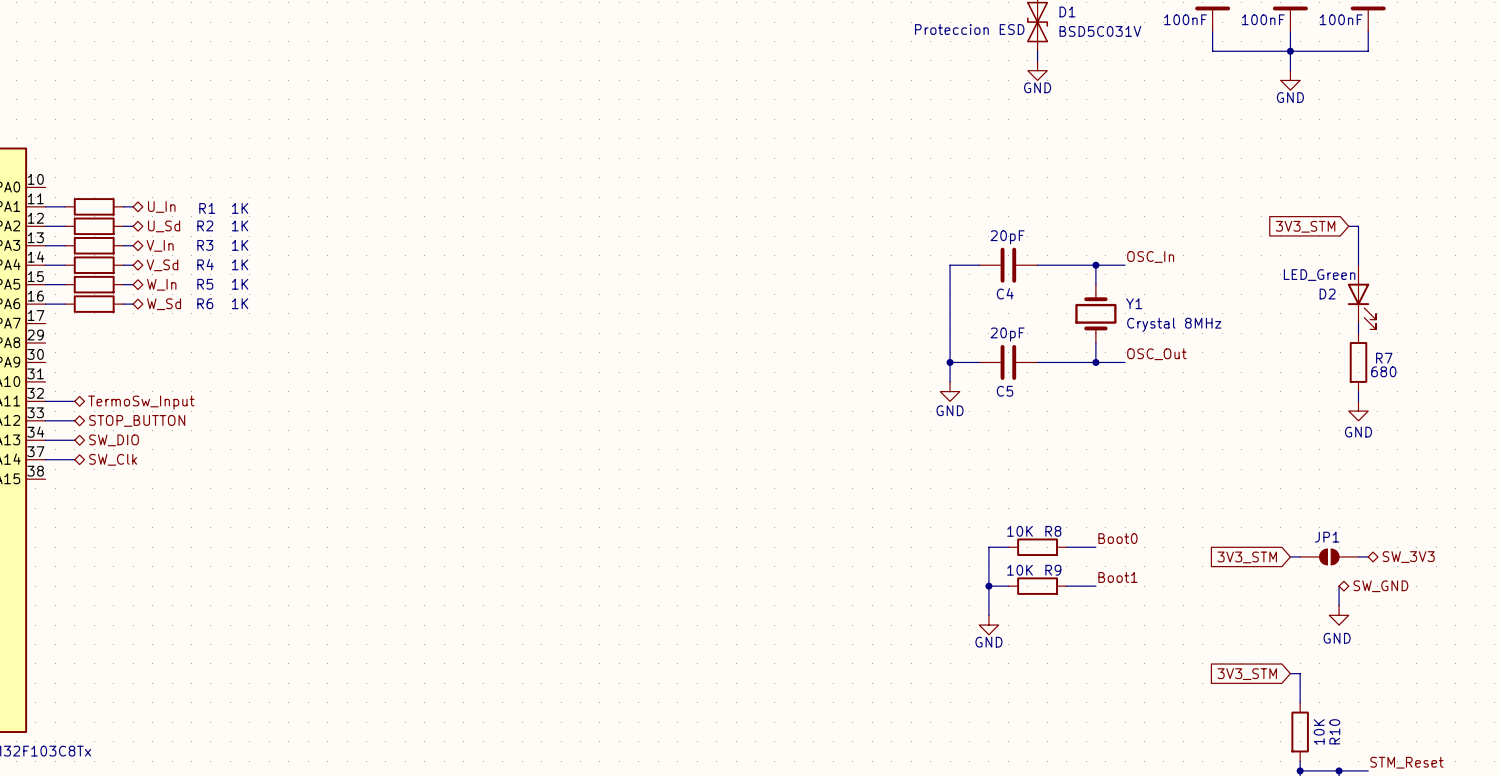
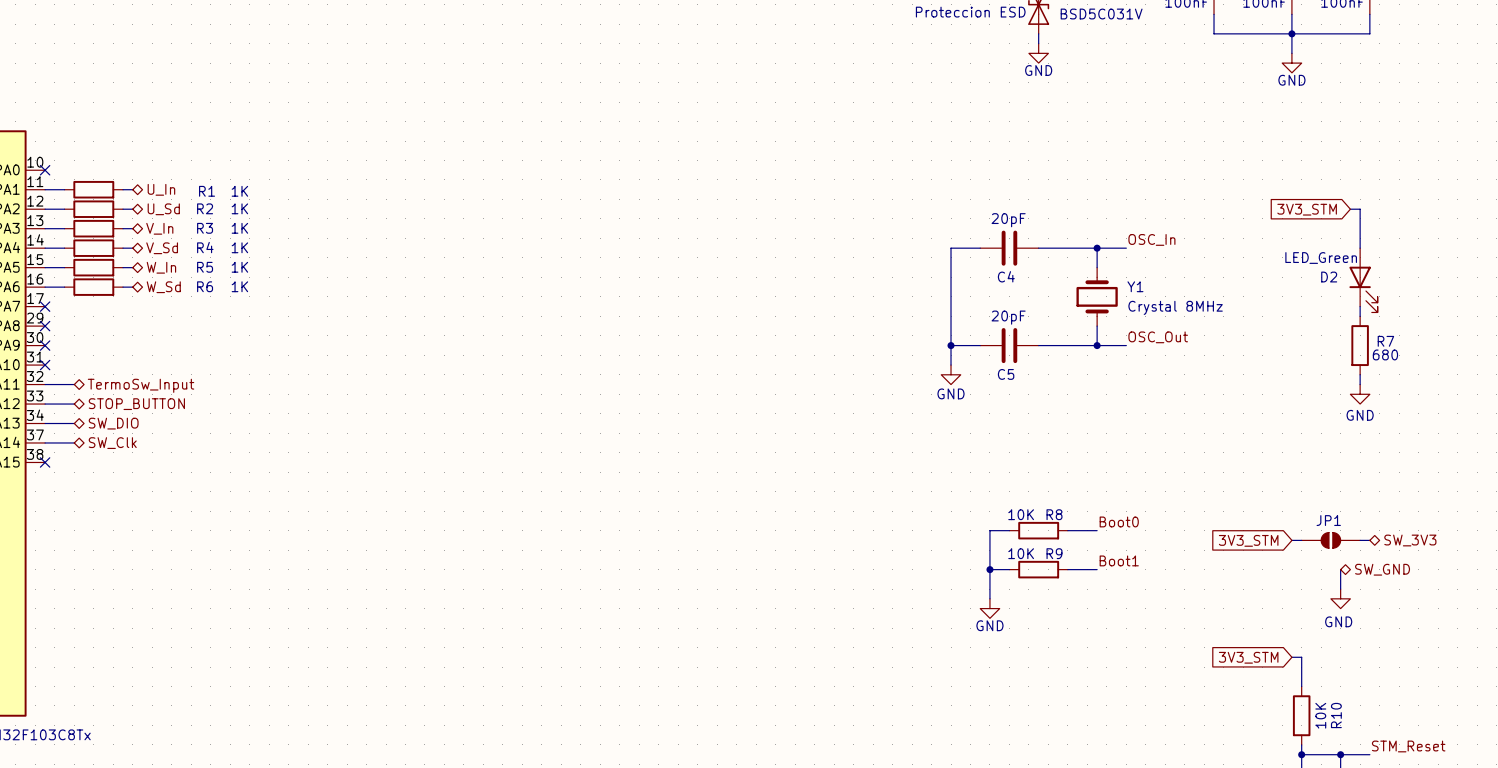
no-connect mark: none -> (45, 170)
no-connect mark: none -> (45, 306)
no-connect mark: none -> (45, 326)
no-connect mark: none -> (45, 345)
no-connect mark: none -> (45, 365)
no-connect mark: none -> (45, 462)

